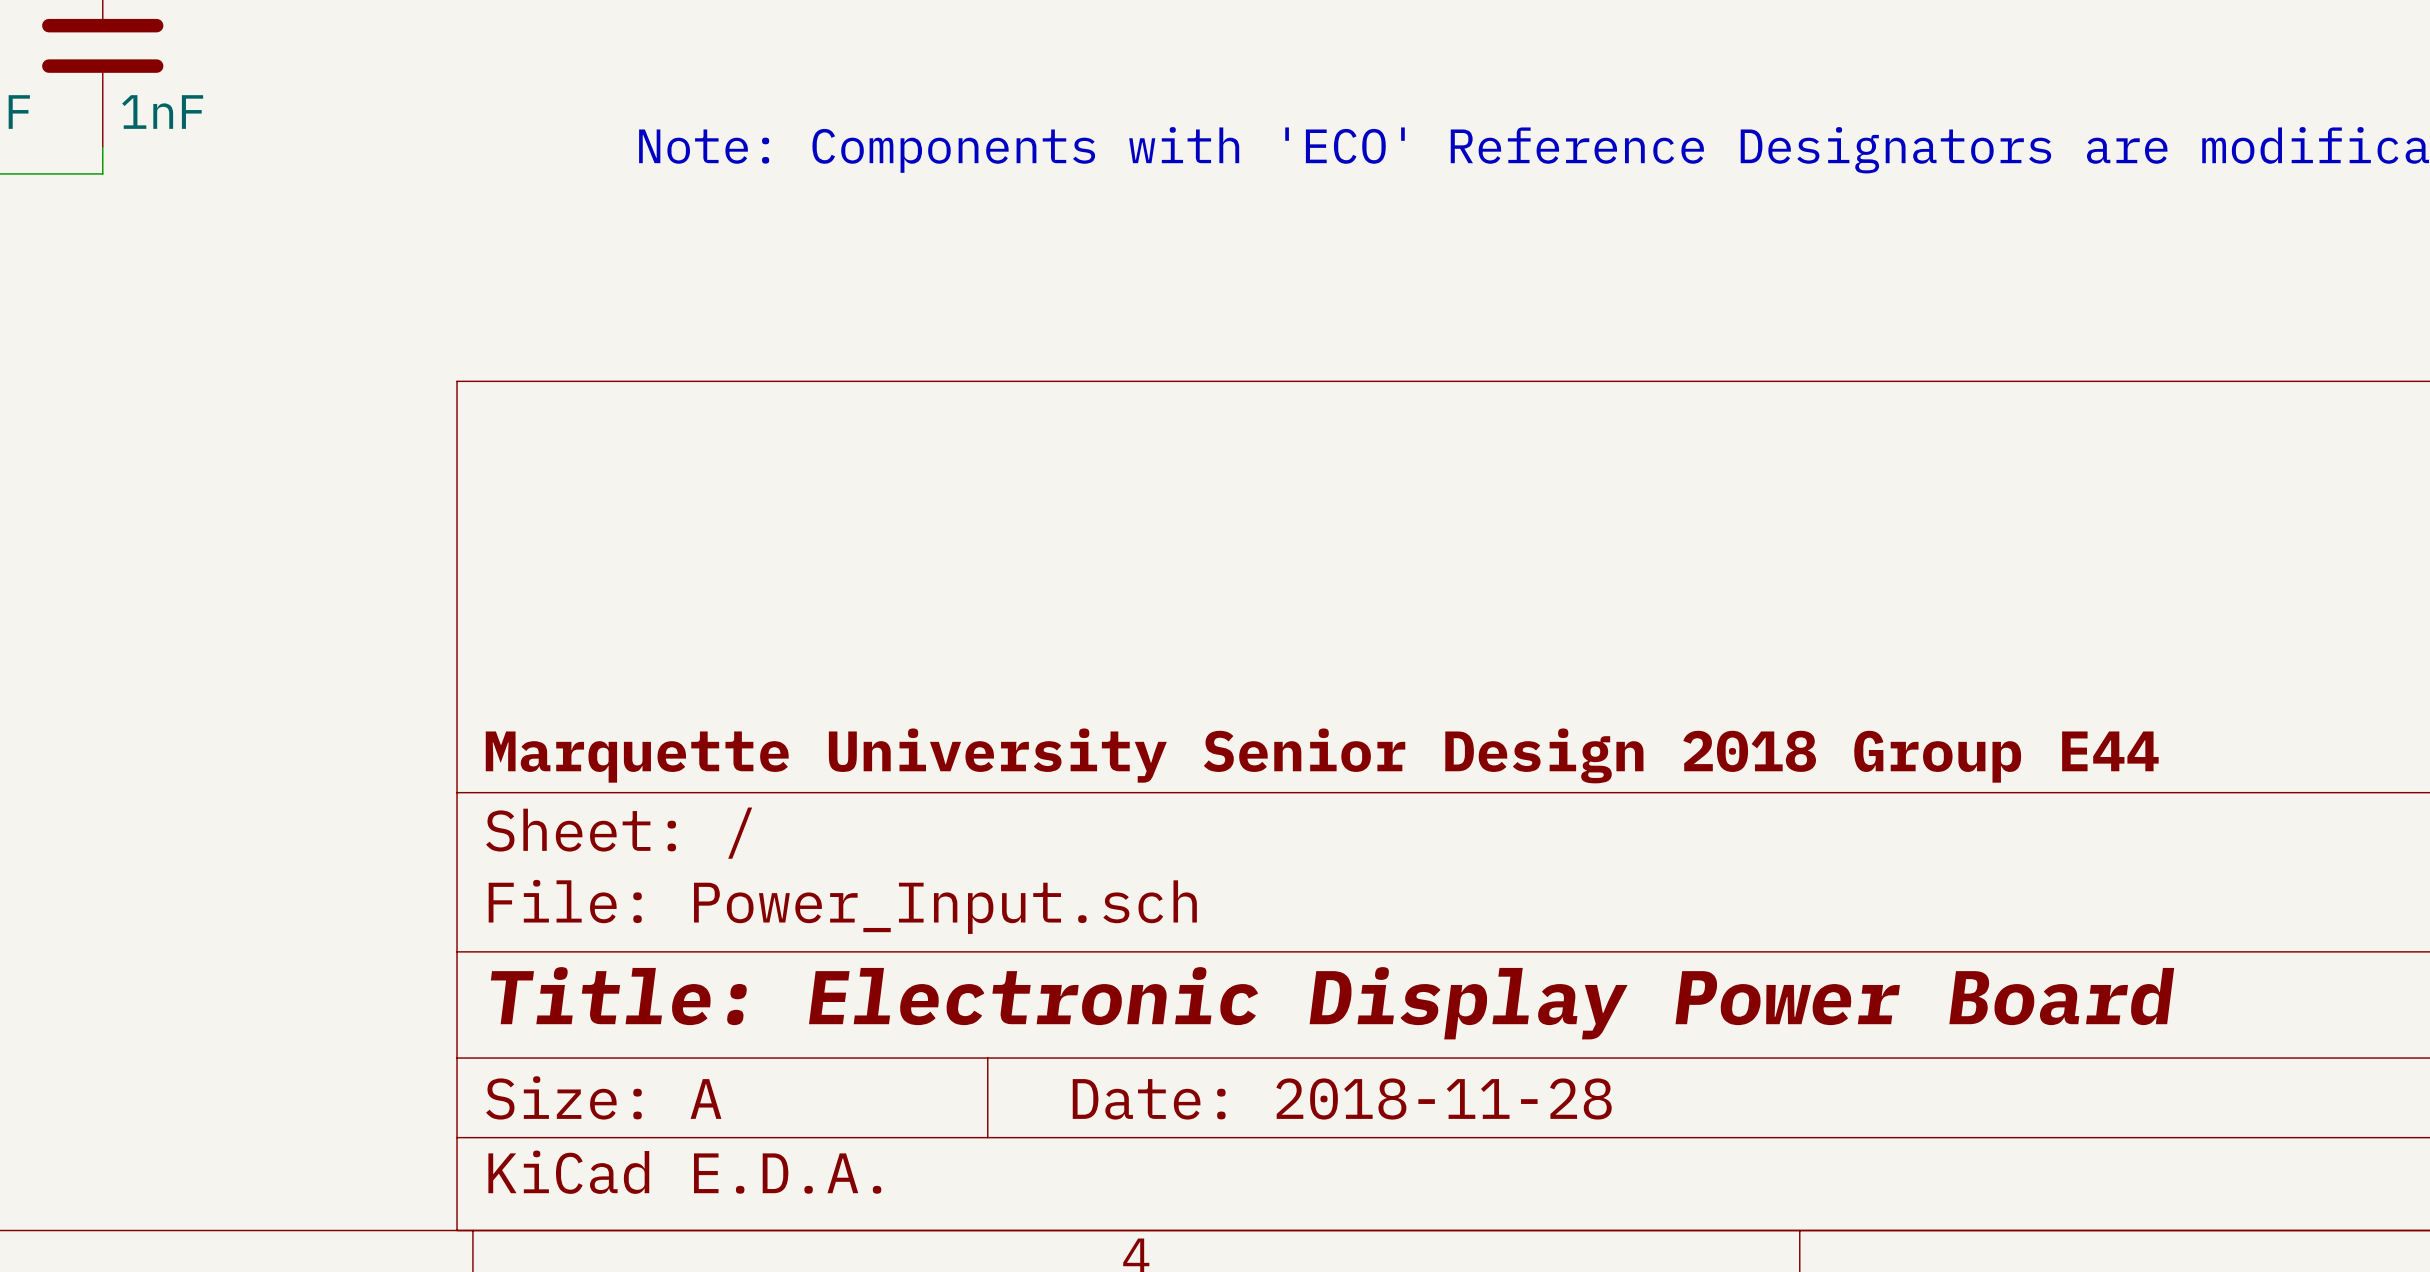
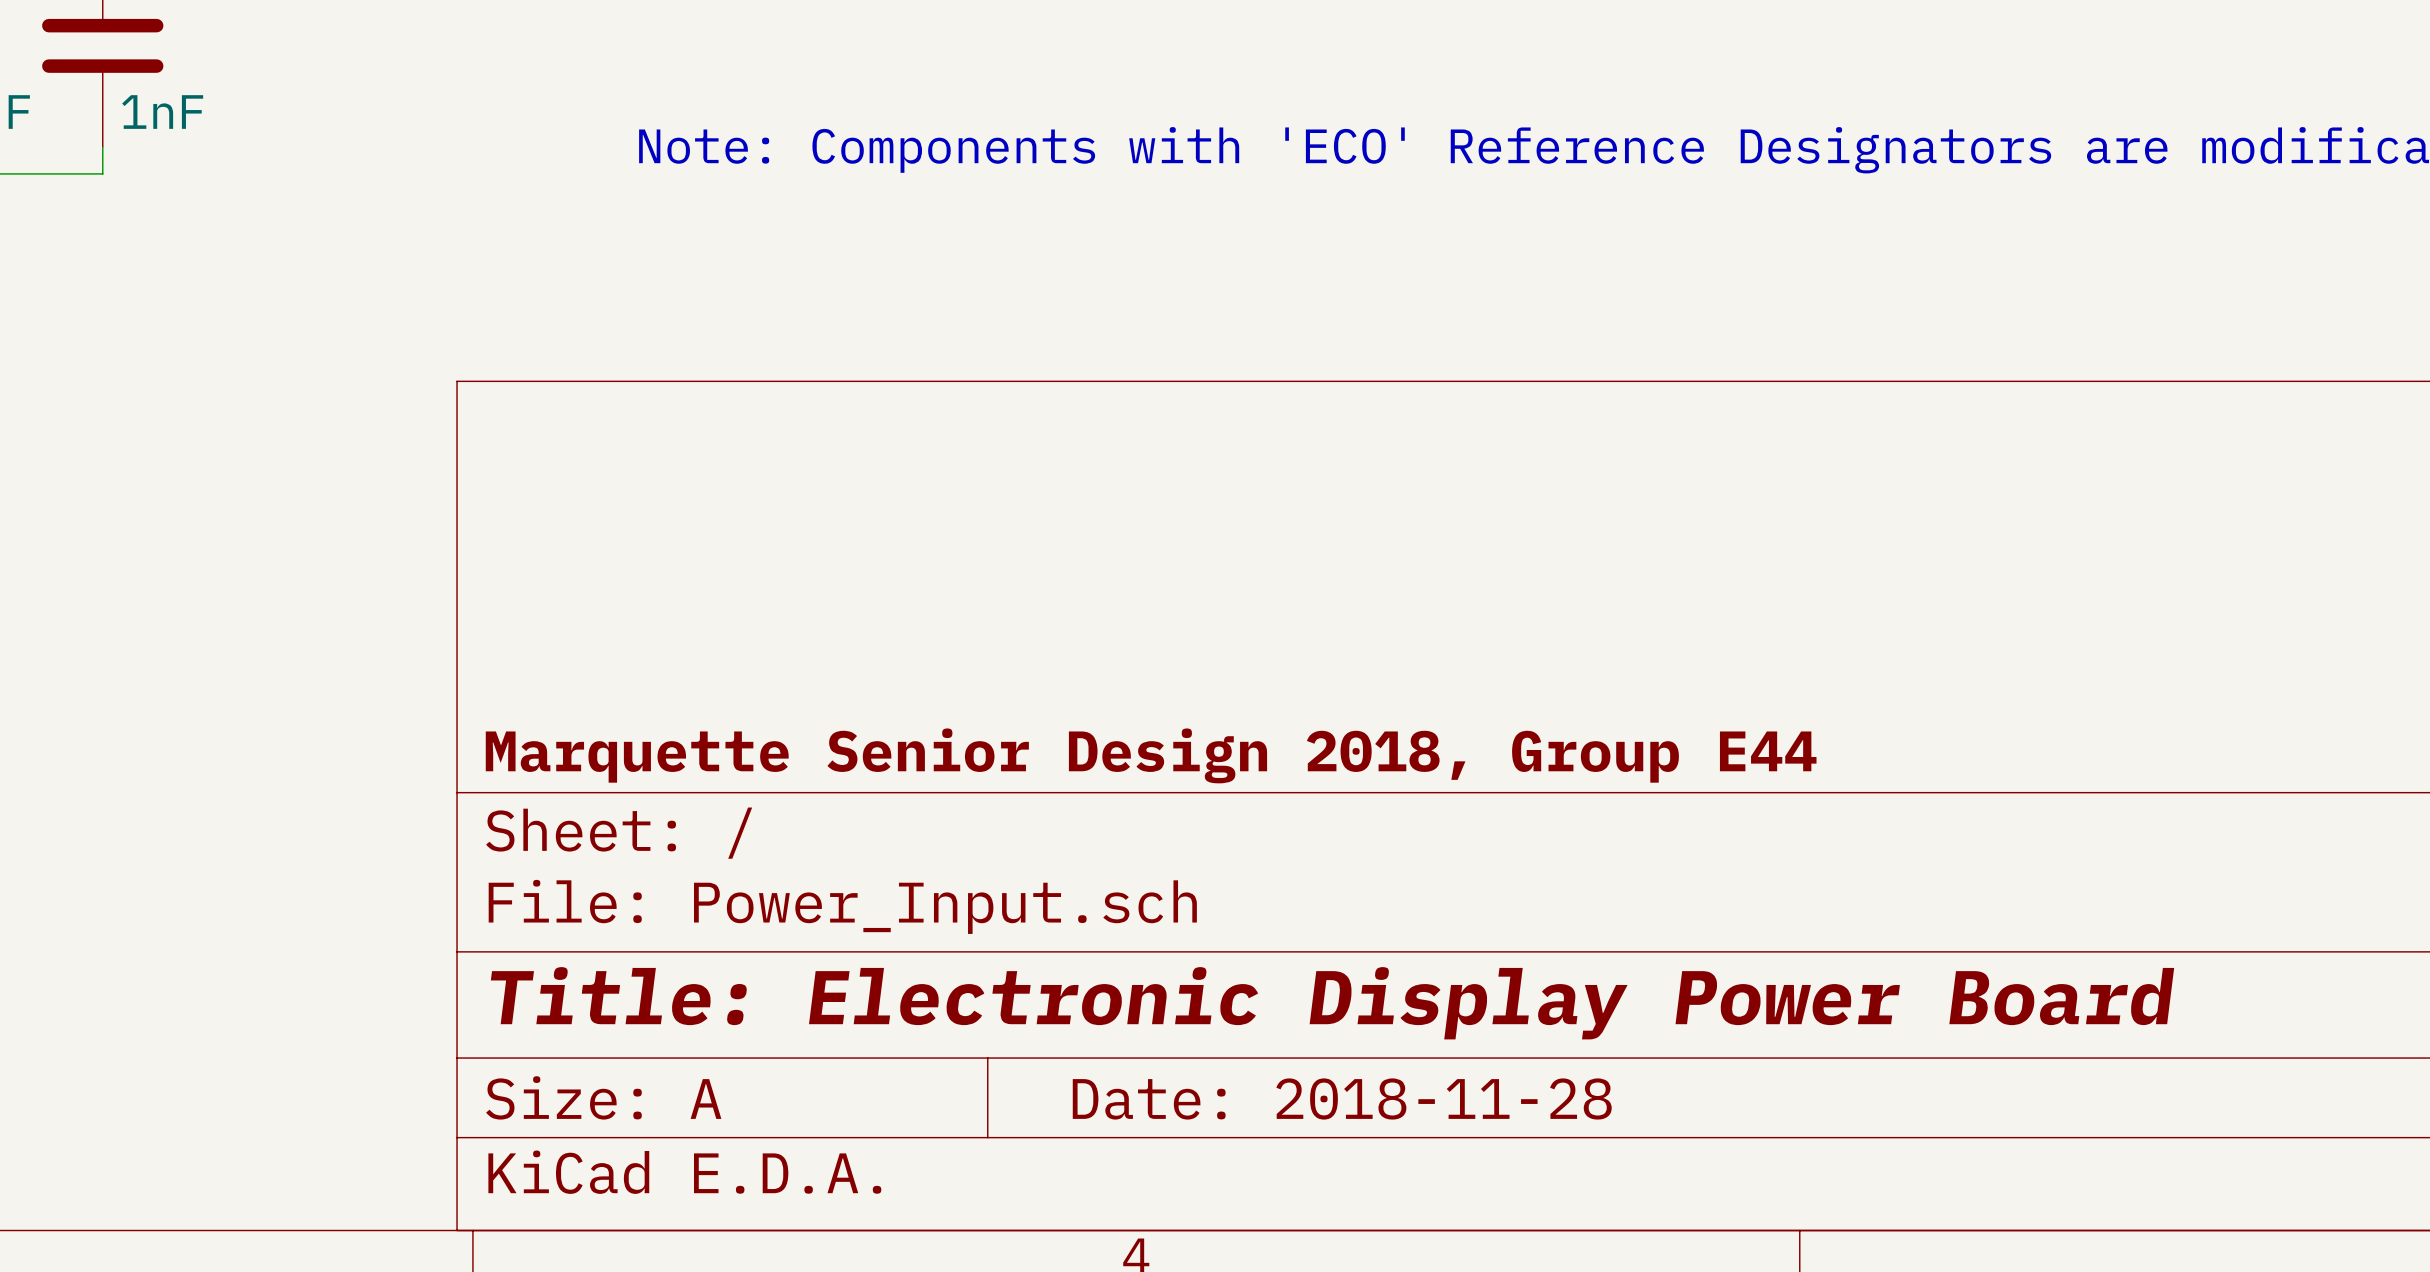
title block: Marquette University Senior Design 2018 Group E44 (1322, 755) -> Marquette Senior Design 2018, Group E44 (1151, 755)

